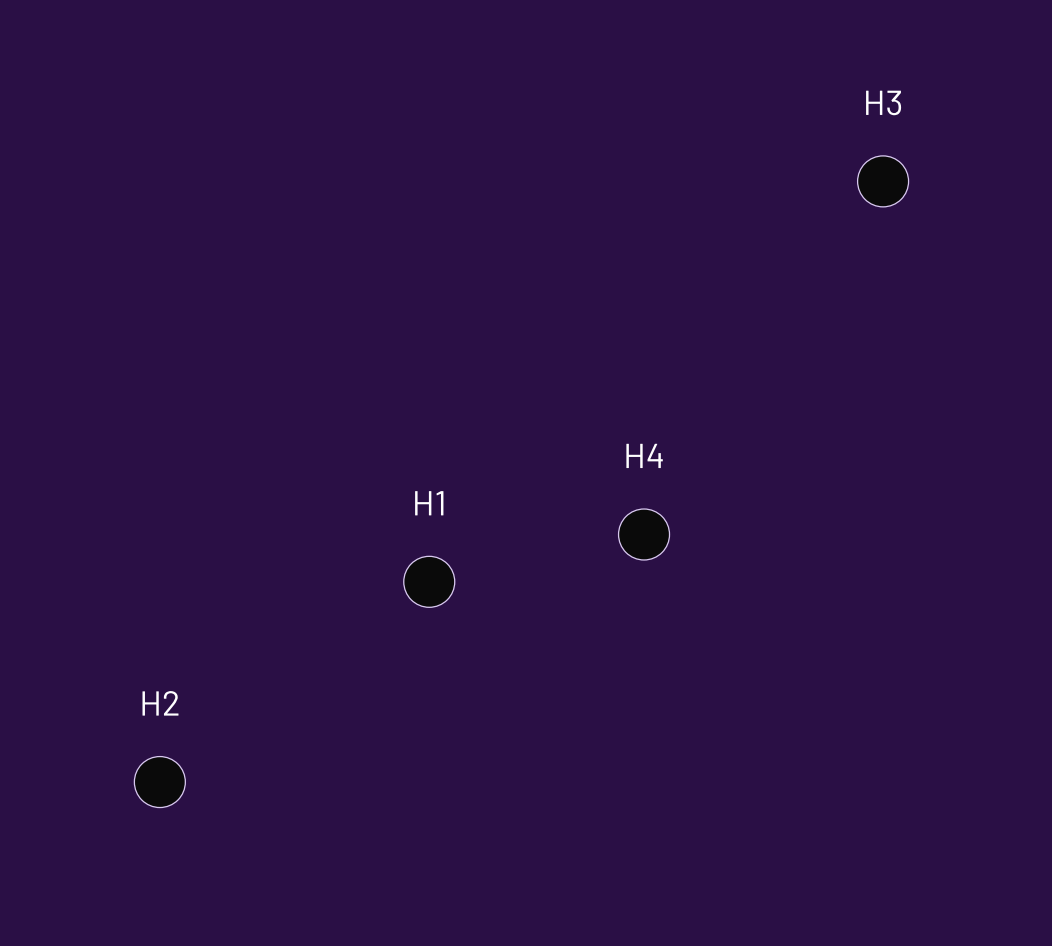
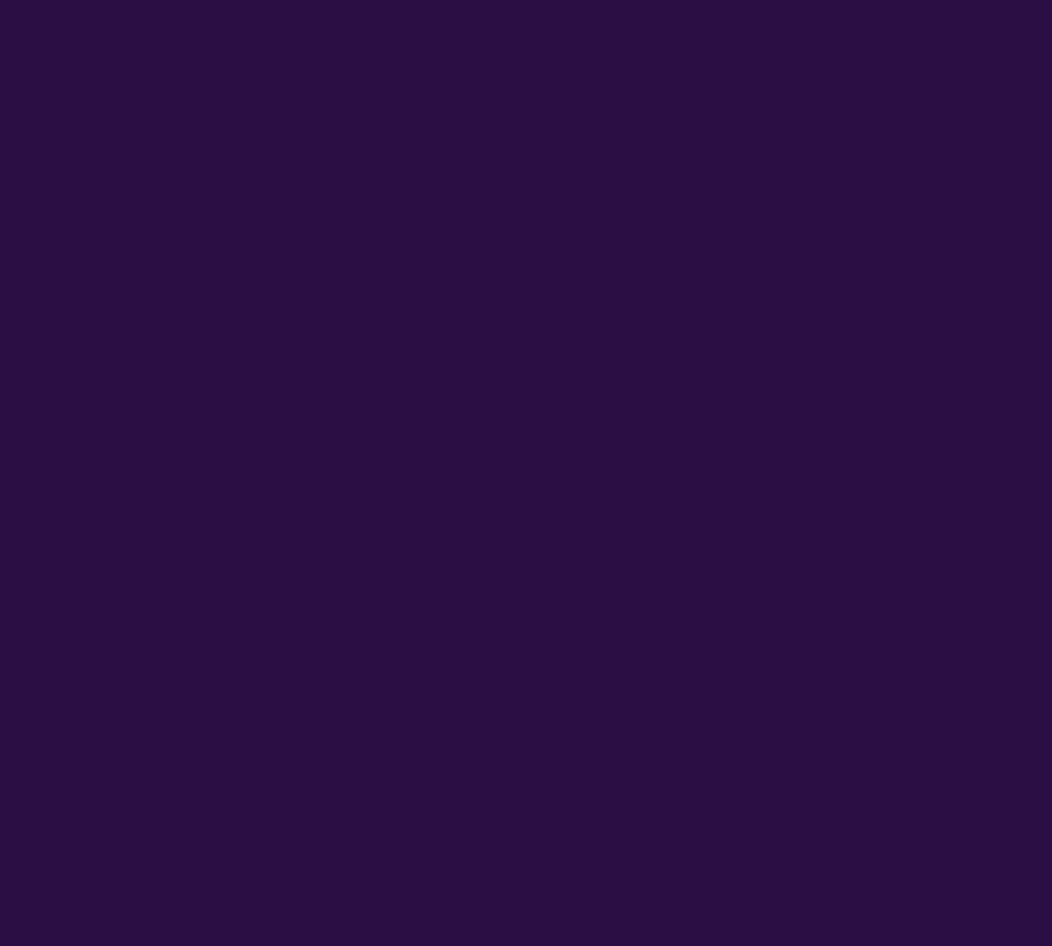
H3: (883, 181) -> none
H4: (644, 534) -> none
H1: (429, 581) -> none
H2: (159, 782) -> none

